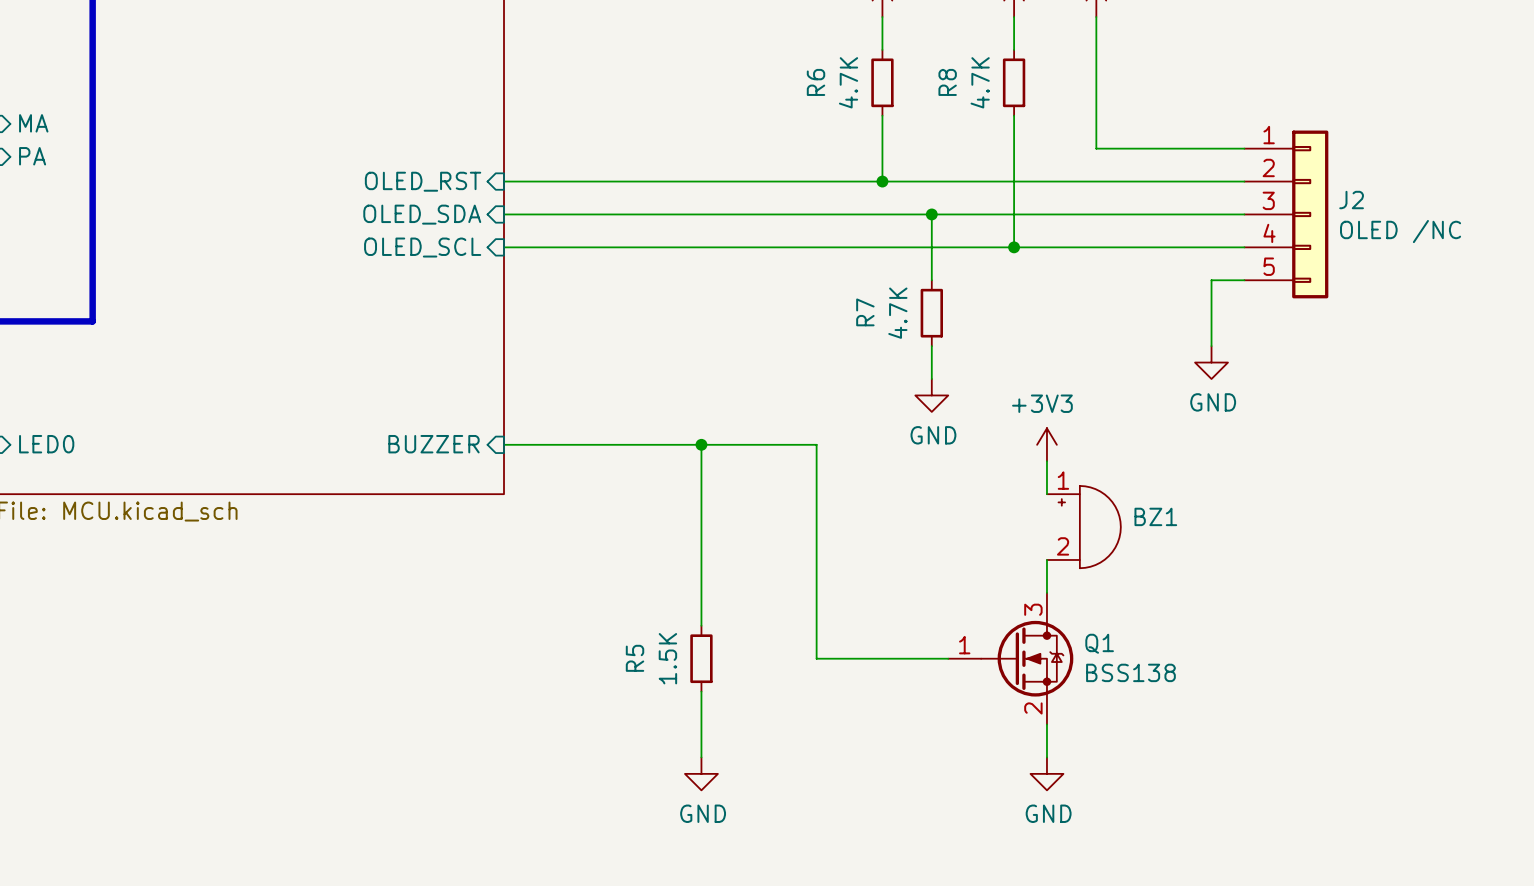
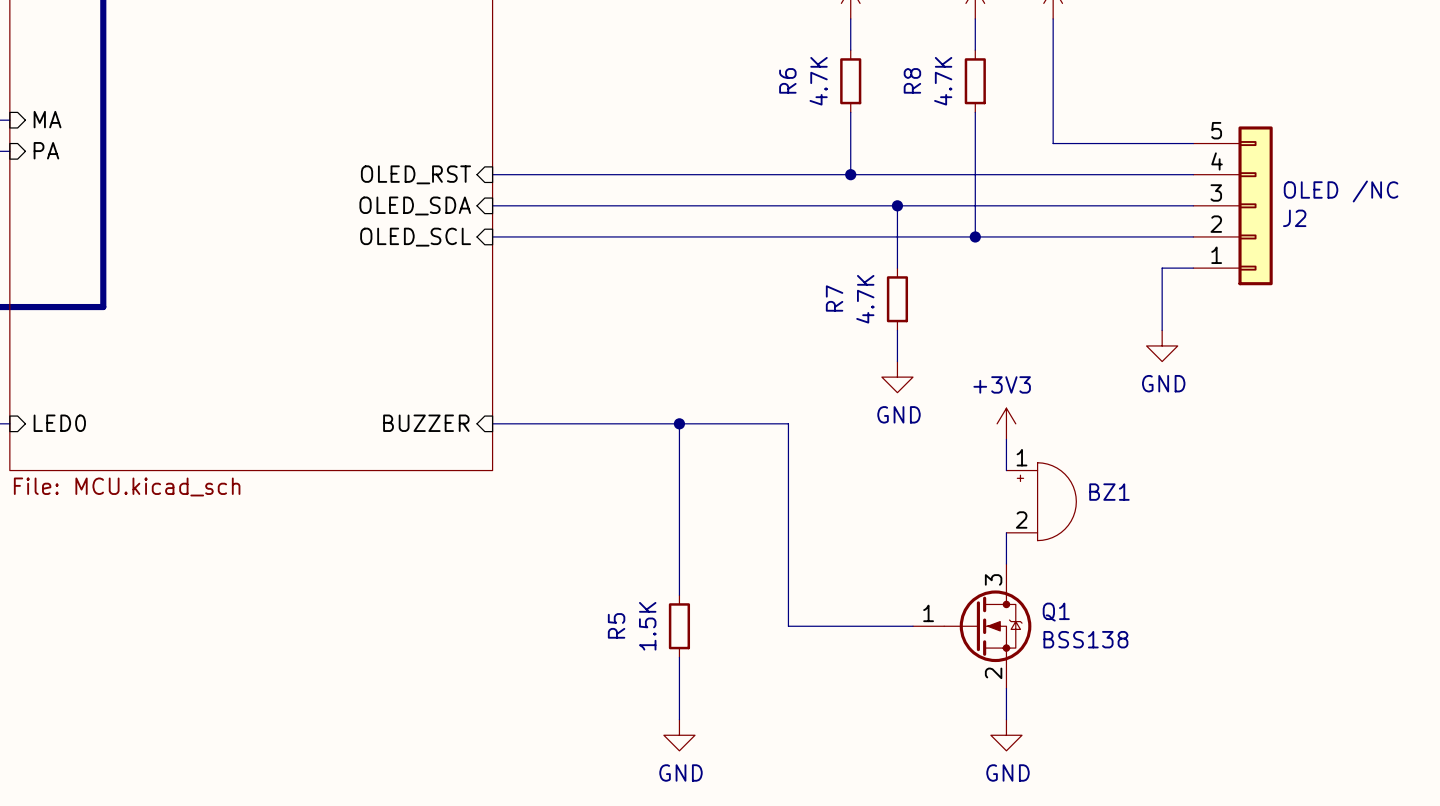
J2 flip: as is (1310, 214) -> up-down (1255, 205)

